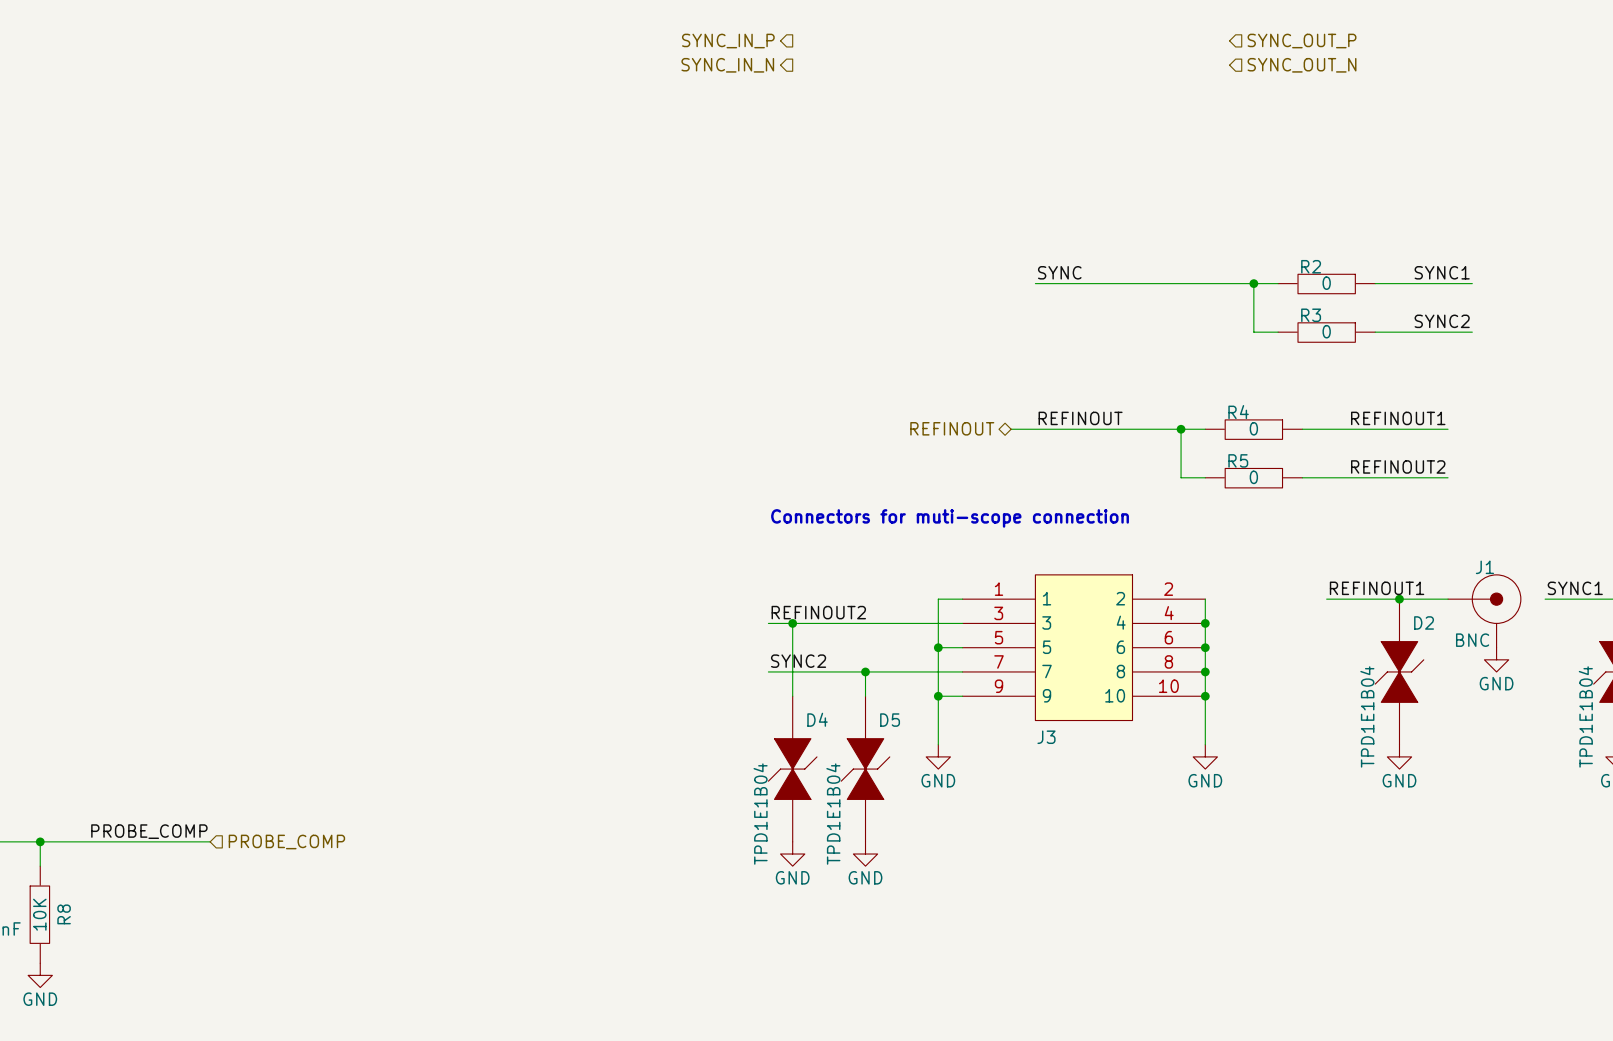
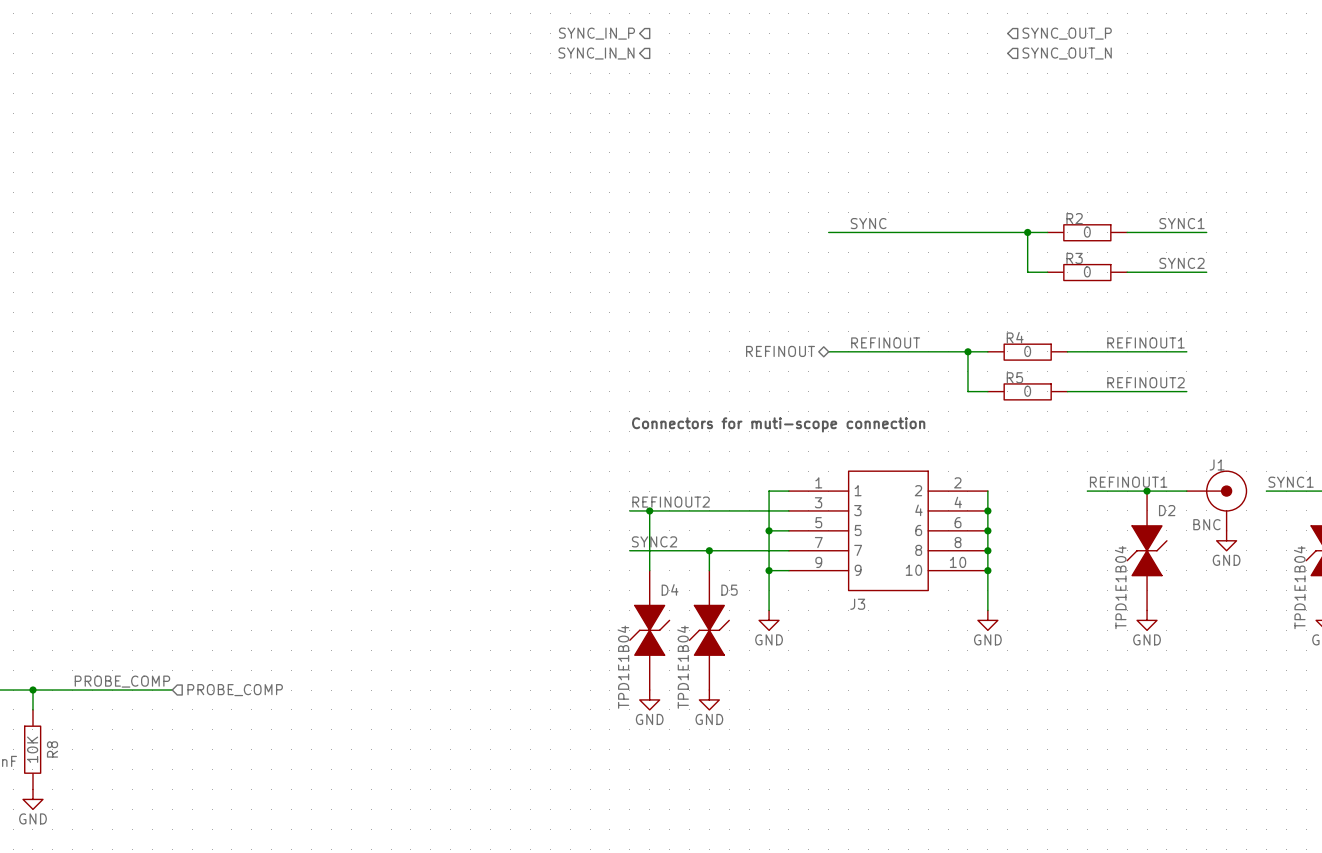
wire: none -> (828, 232) (848, 232)

